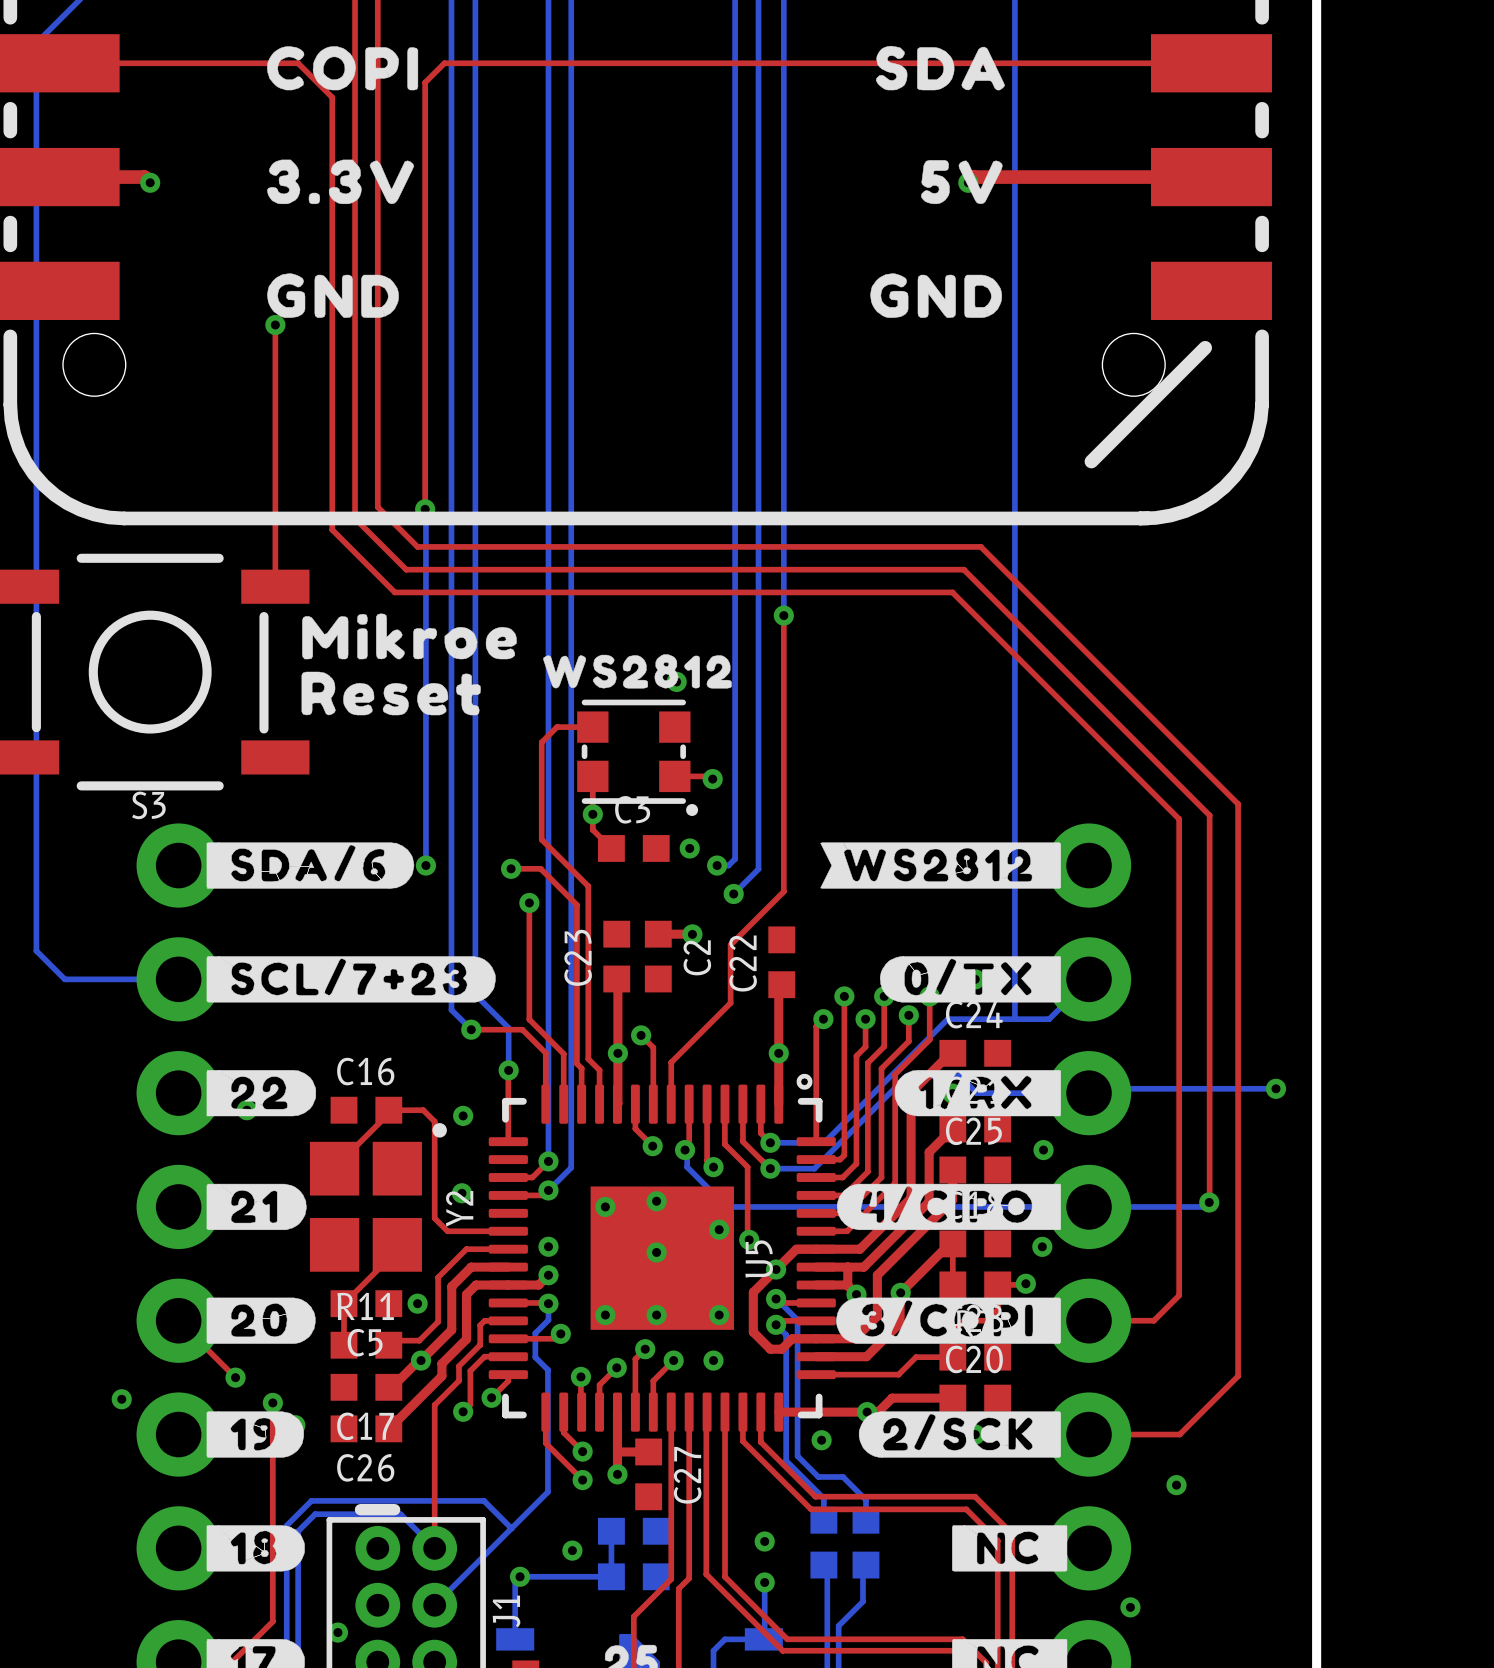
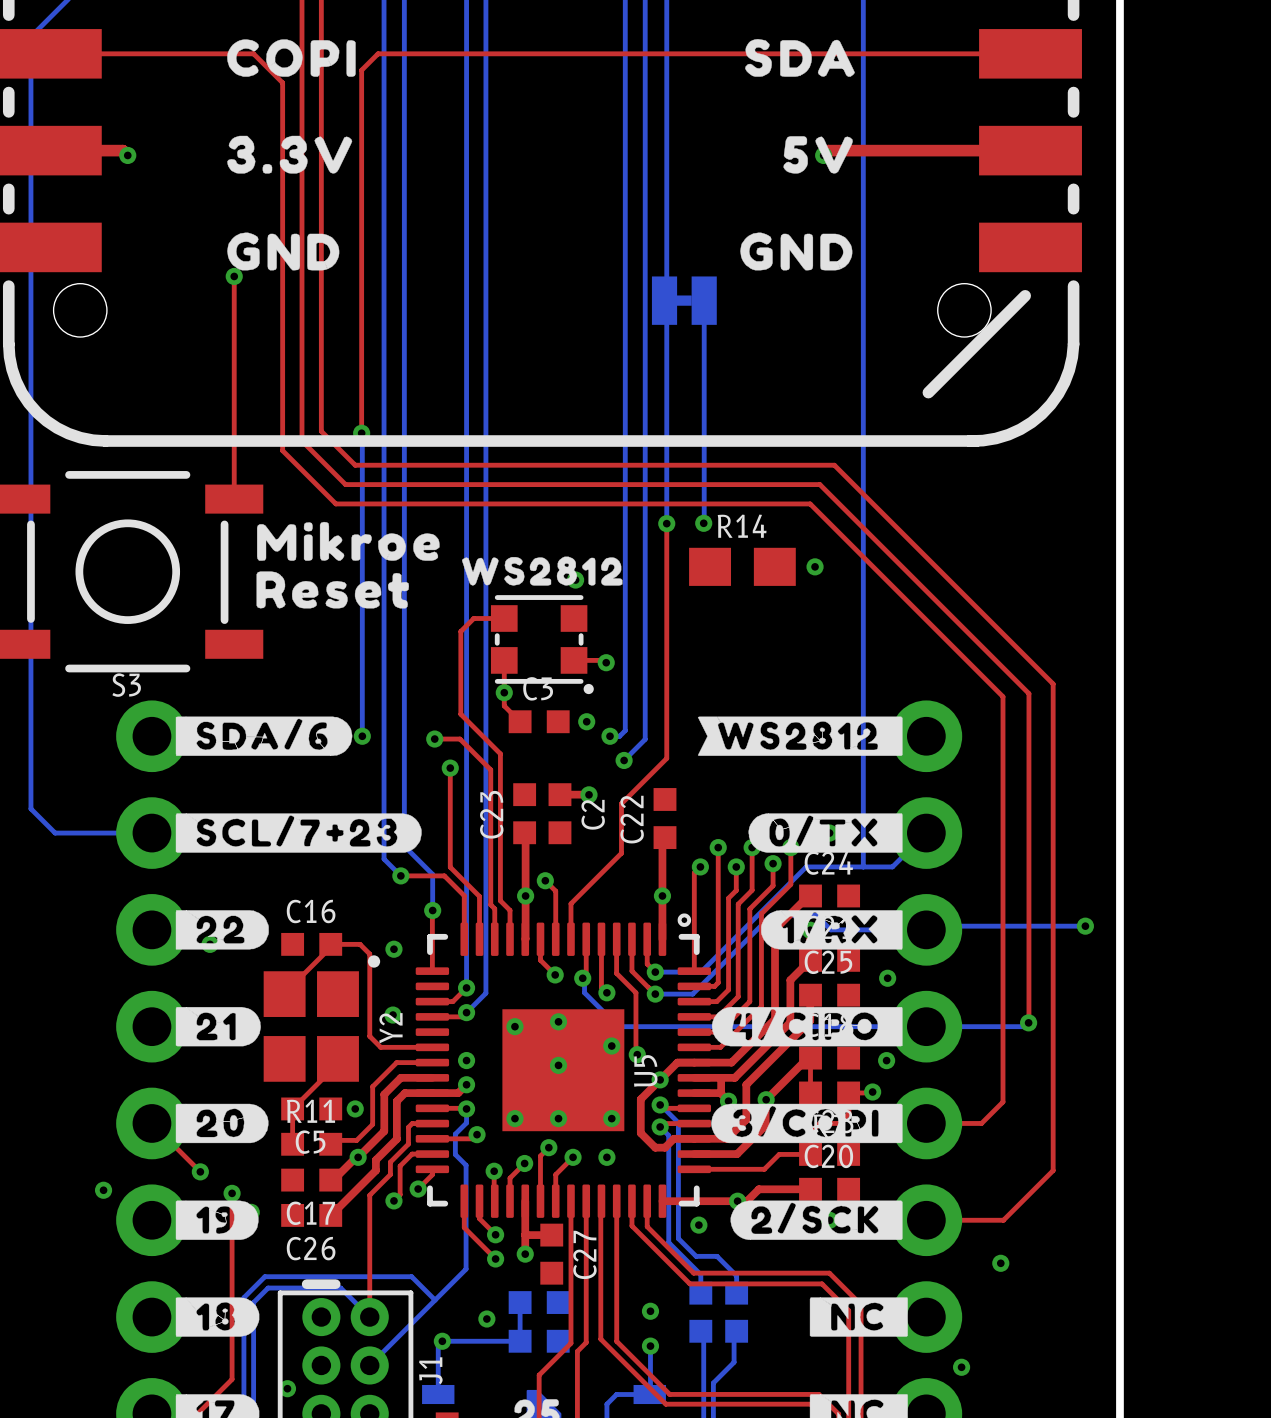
part: none -> (684, 300)
bottom track: none -> (704, 300) (704, 522)
via: none -> (703, 523)
R14: none -> (742, 566)
via: none -> (815, 566)

